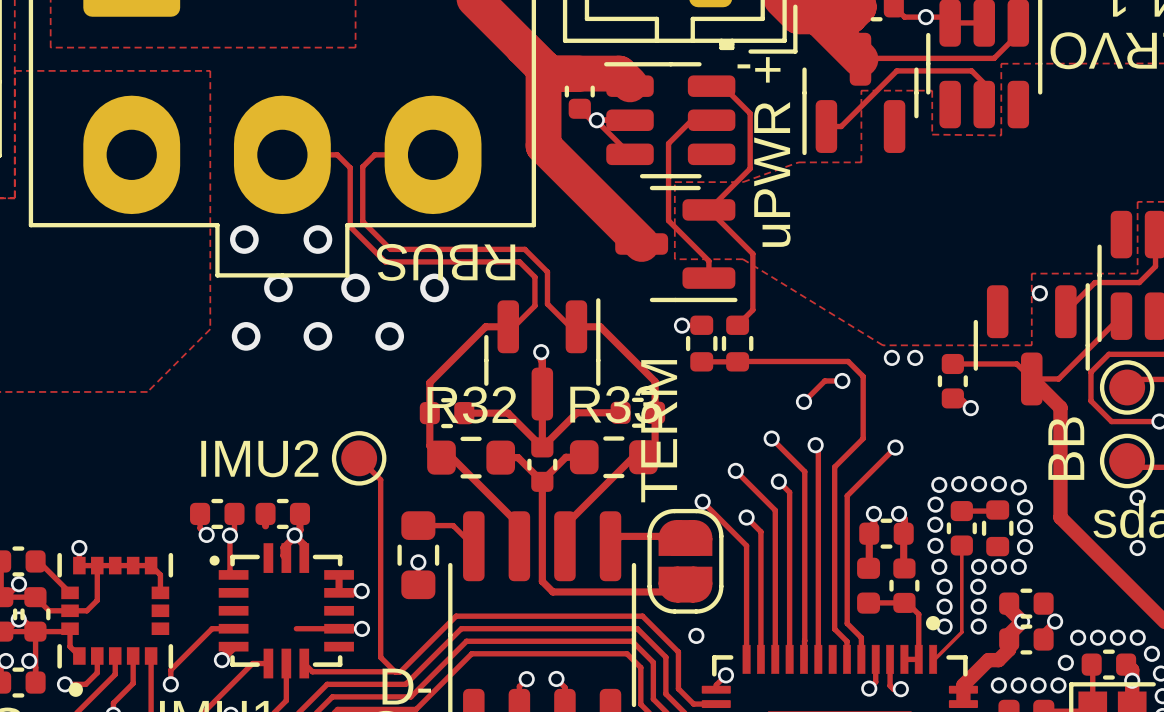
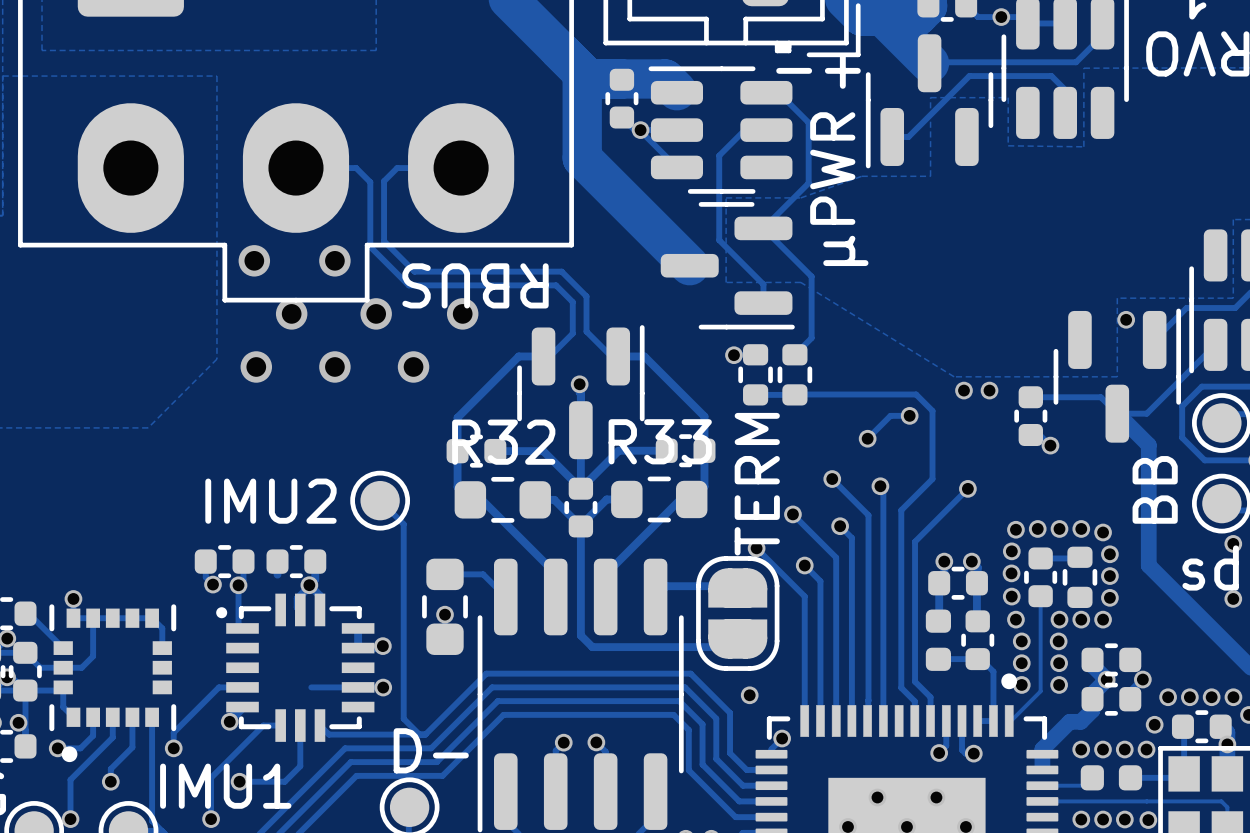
text: uPWR (772, 174) -> µPWR (839, 189)
text position: TERM (659, 431) -> TERM (757, 484)

